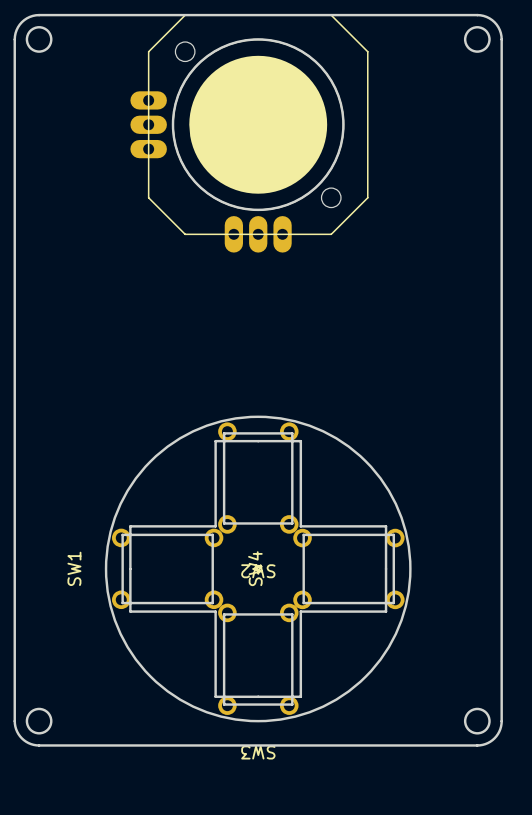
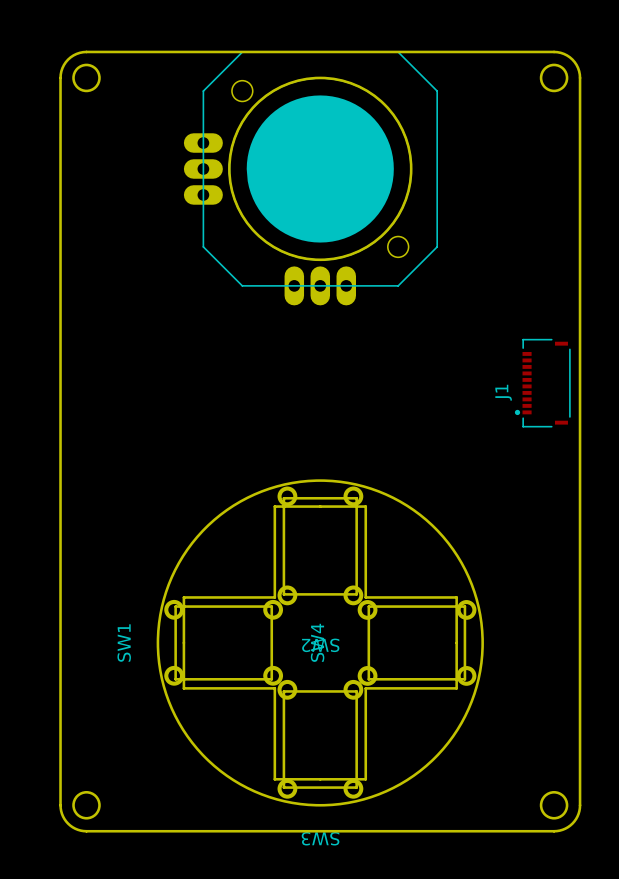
J1: none -> (542, 383)

